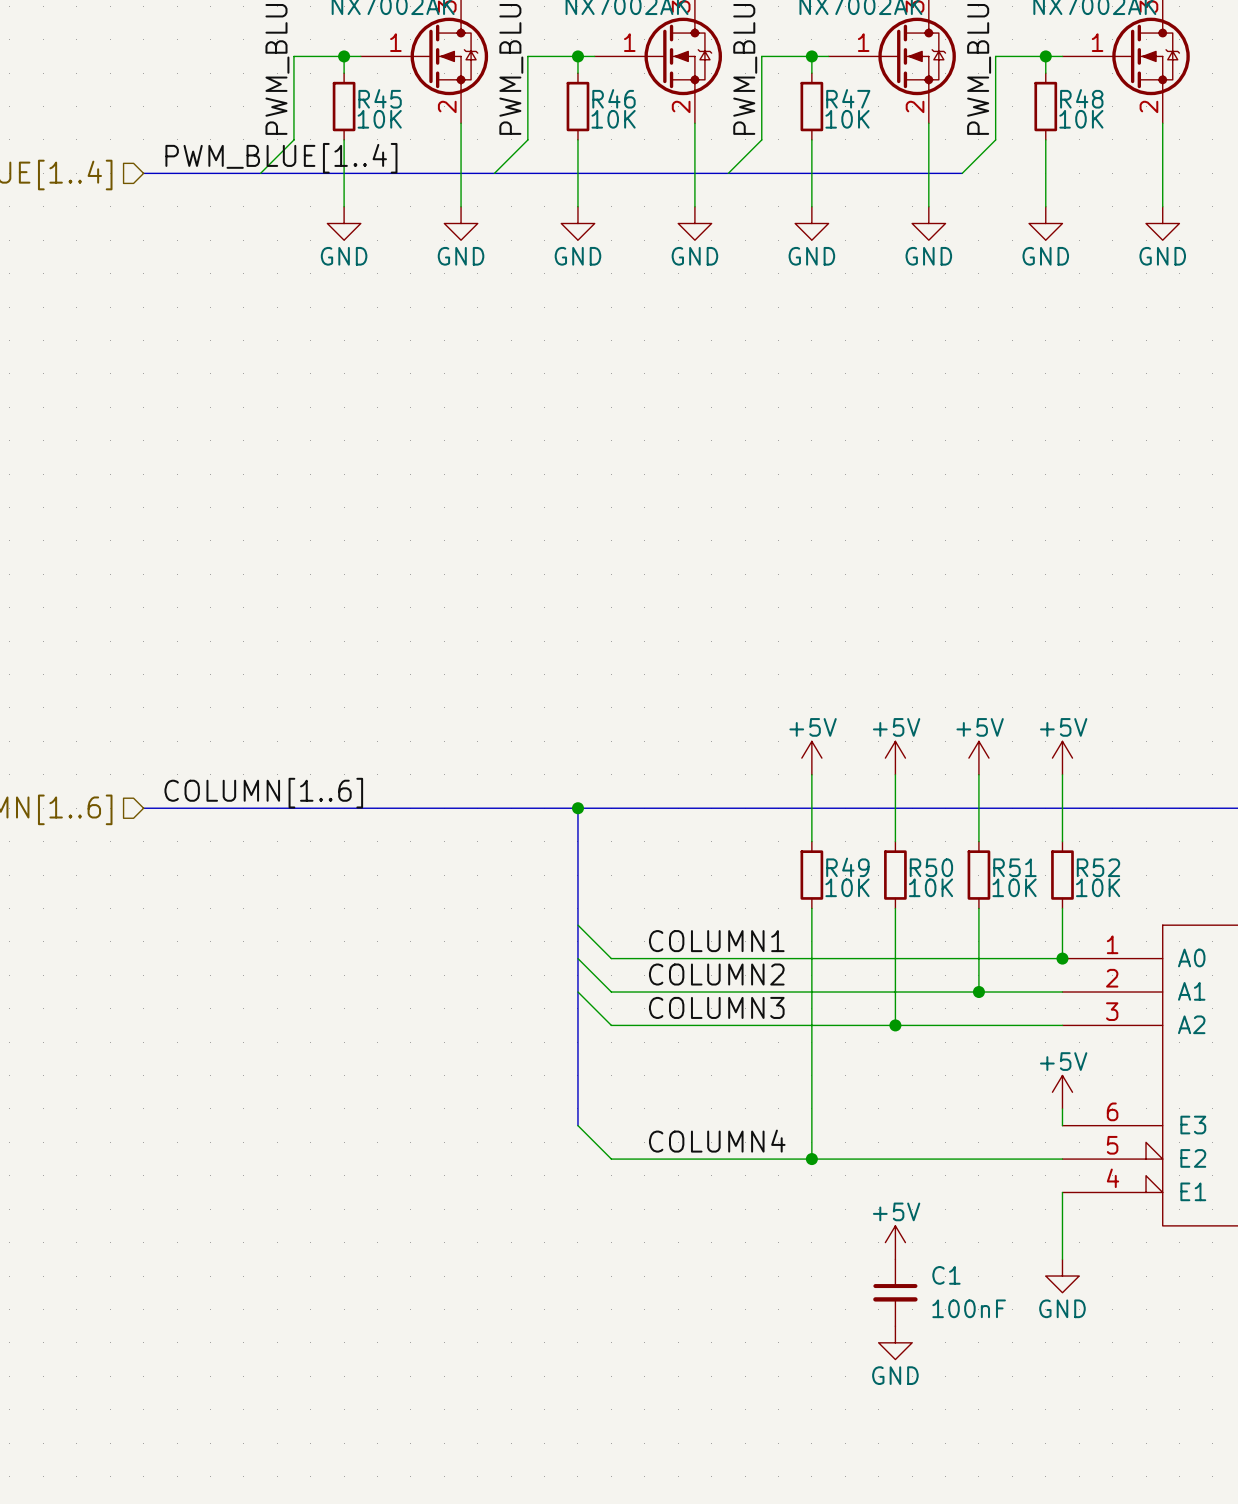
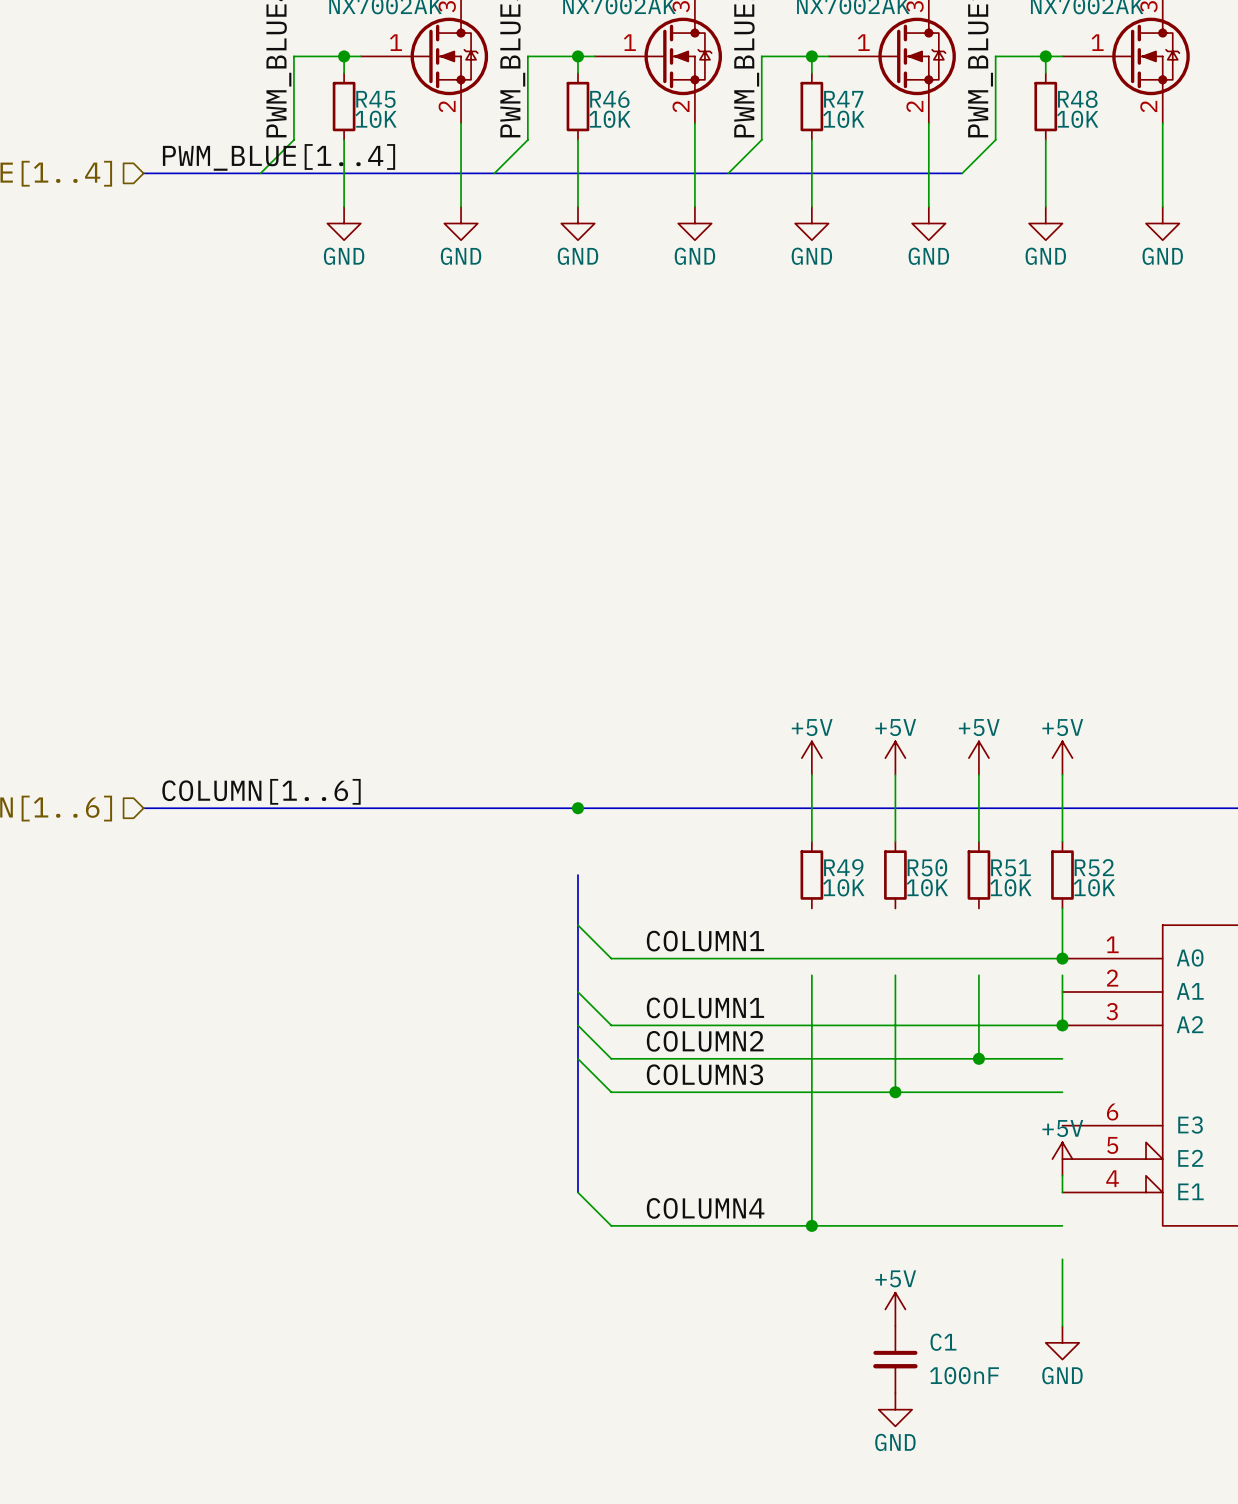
bus: (577, 808) (577, 875) -> (577, 1125) (577, 1192)
wire: (811, 908) (811, 975) -> (811, 1159) (811, 1225)
wire: (895, 908) (895, 975) -> (895, 1025) (895, 1092)
wire: (978, 908) (978, 975) -> (978, 992) (978, 1058)
wire: (577, 958) (611, 992) (1062, 992) -> (577, 1025) (611, 1058) (1062, 1058)
label position: COLUMN2 (716, 974) -> COLUMN2 (705, 1041)
wire: none -> (1062, 975) (1062, 1025)
junction: (978, 992) -> none
label: COLUMN3 (716, 1007) -> COLUMN1 (705, 1007)
junction: (895, 1025) -> none
junction: none -> (1062, 1025)
wire: none -> (577, 1058) (611, 1092) (1062, 1092)
junction: none -> (978, 1058)
label: none -> COLUMN3 (704, 1074)
junction: none -> (895, 1092)
power symbol position: +5V (1062, 1092) -> +5V (1062, 1159)
wire: (1062, 1108) (1062, 1125) -> none
wire: (577, 1125) (611, 1159) (1062, 1159) -> (577, 1192) (611, 1225) (1062, 1225)
label position: COLUMN4 (717, 1141) -> COLUMN4 (705, 1208)
junction: (811, 1159) -> none
wire: (1062, 1192) (1062, 1259) -> (1062, 1192) (1062, 1175)
junction: none -> (811, 1225)
power symbol position: +5V (895, 1242) -> +5V (895, 1309)
wire: none -> (1062, 1259) (1062, 1326)
power symbol position: GND (1062, 1276) -> GND (1062, 1342)
C1 position: (895, 1292) -> (895, 1359)
power symbol position: GND (895, 1342) -> GND (895, 1409)

